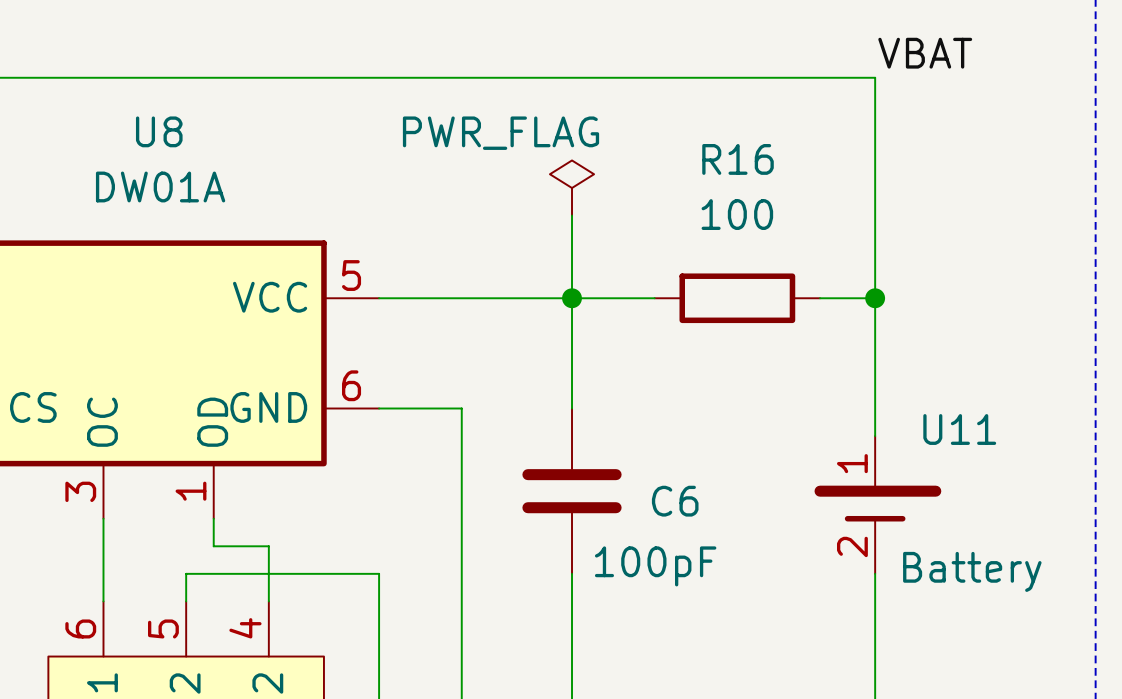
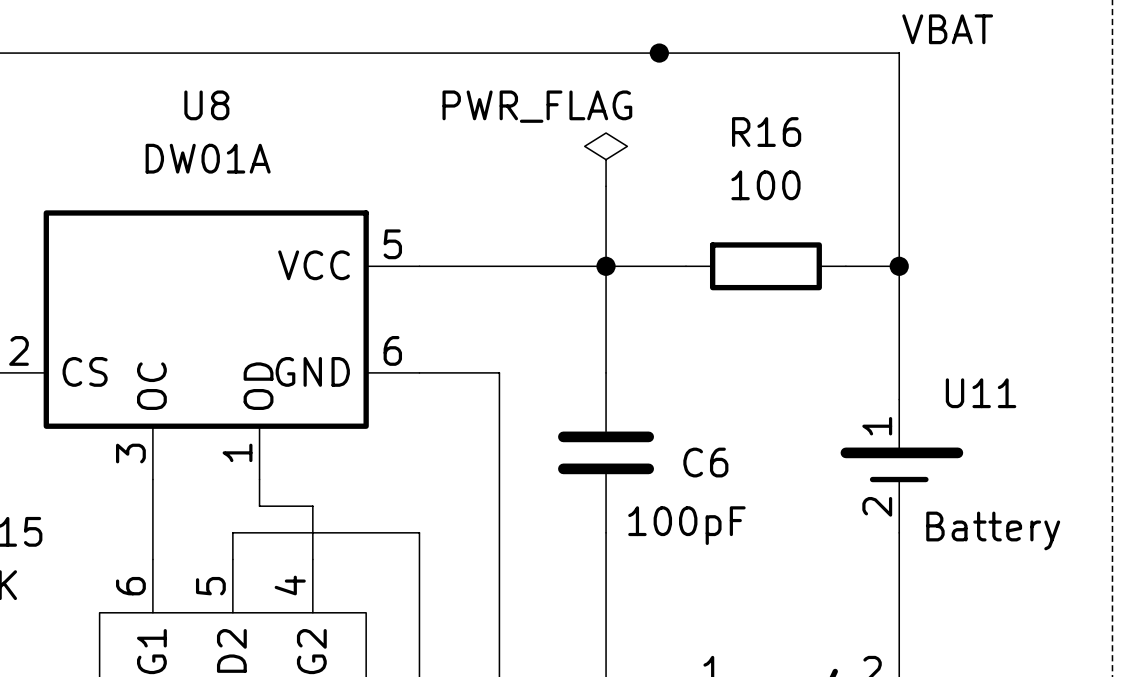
junction: none -> (659, 53)

